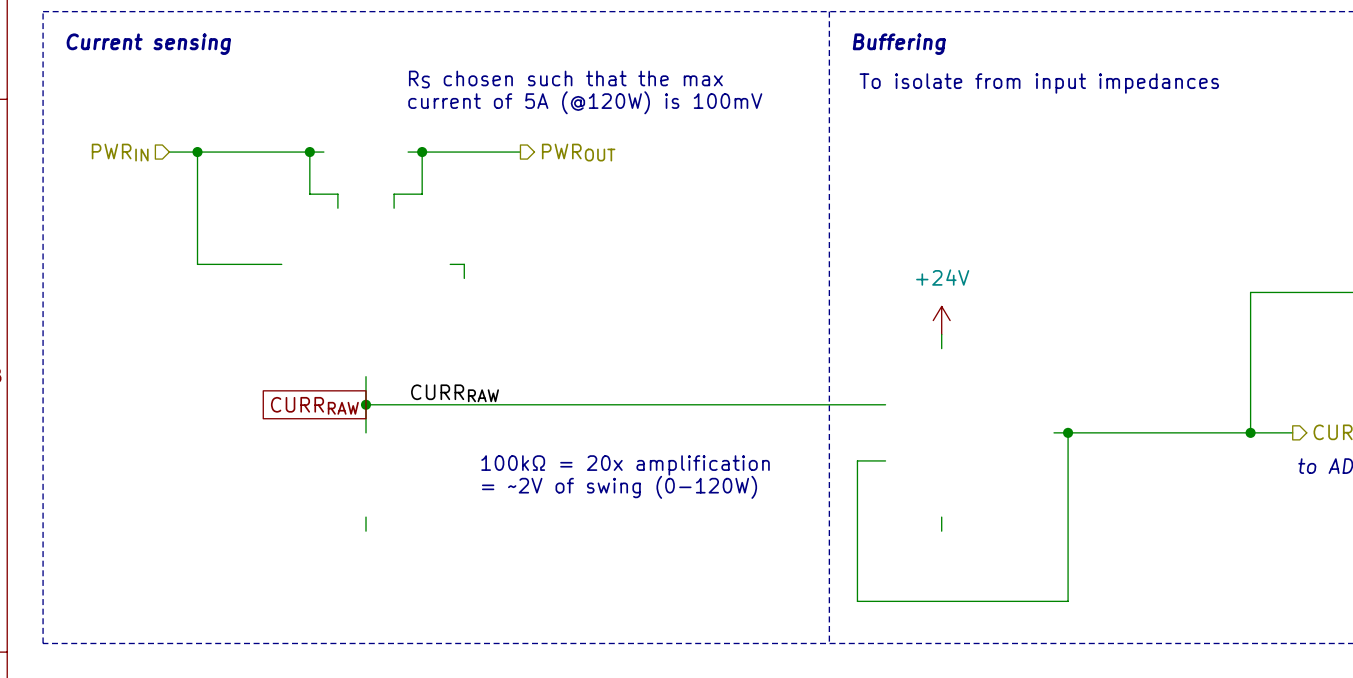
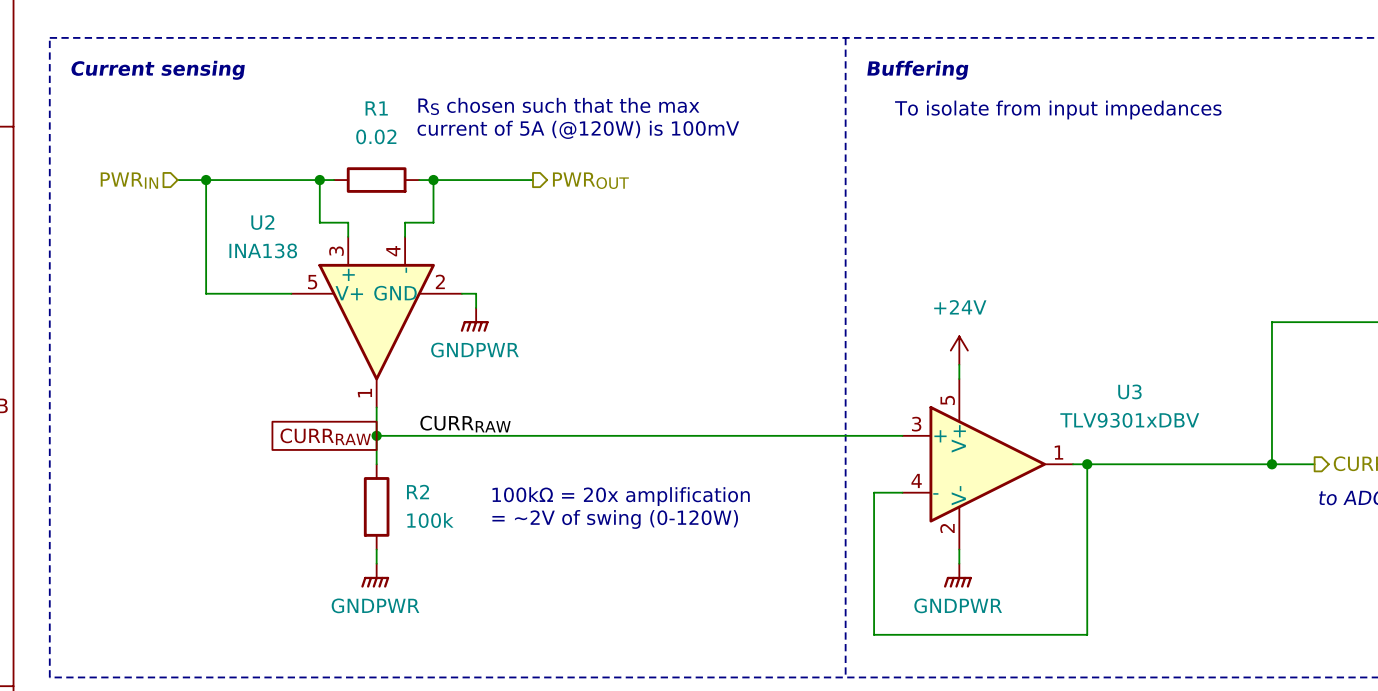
R1: none -> 0.02 (376, 180)
power symbol: none -> GNDPWR (474, 319)
U2: none -> INA138 (376, 322)
U3: none -> TLV9301xDBV (987, 464)
R2: none -> 100k (376, 506)
power symbol: none -> GNDPWR (375, 575)
power symbol: none -> GNDPWR (957, 575)

